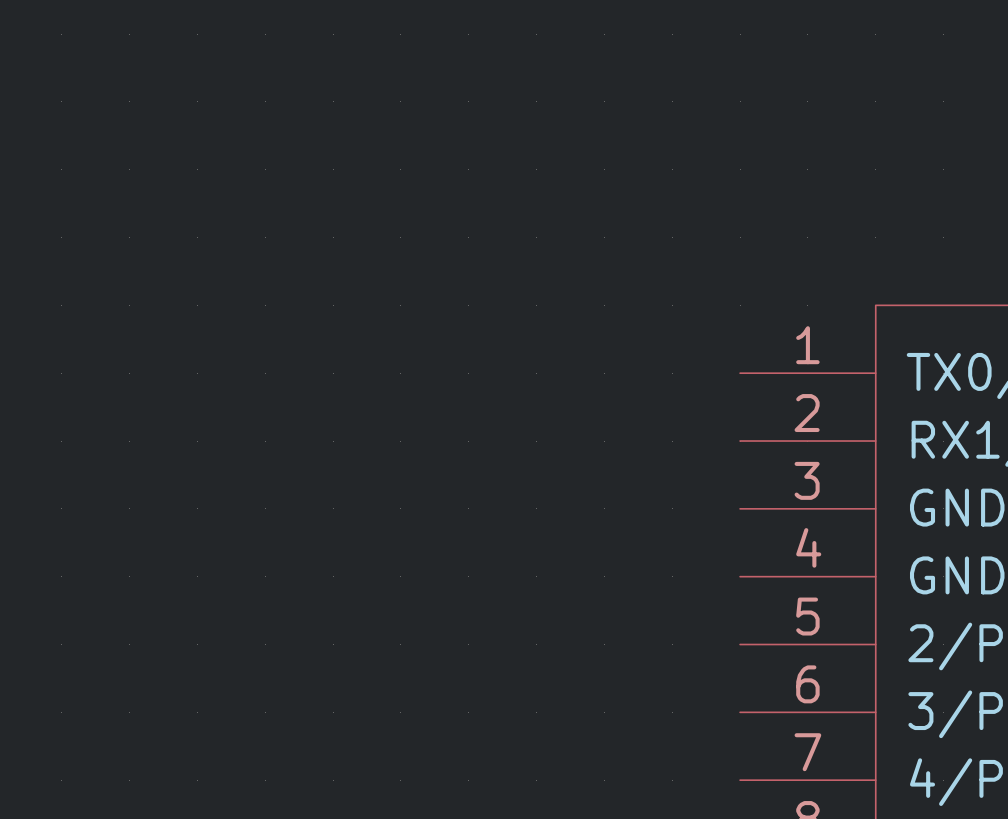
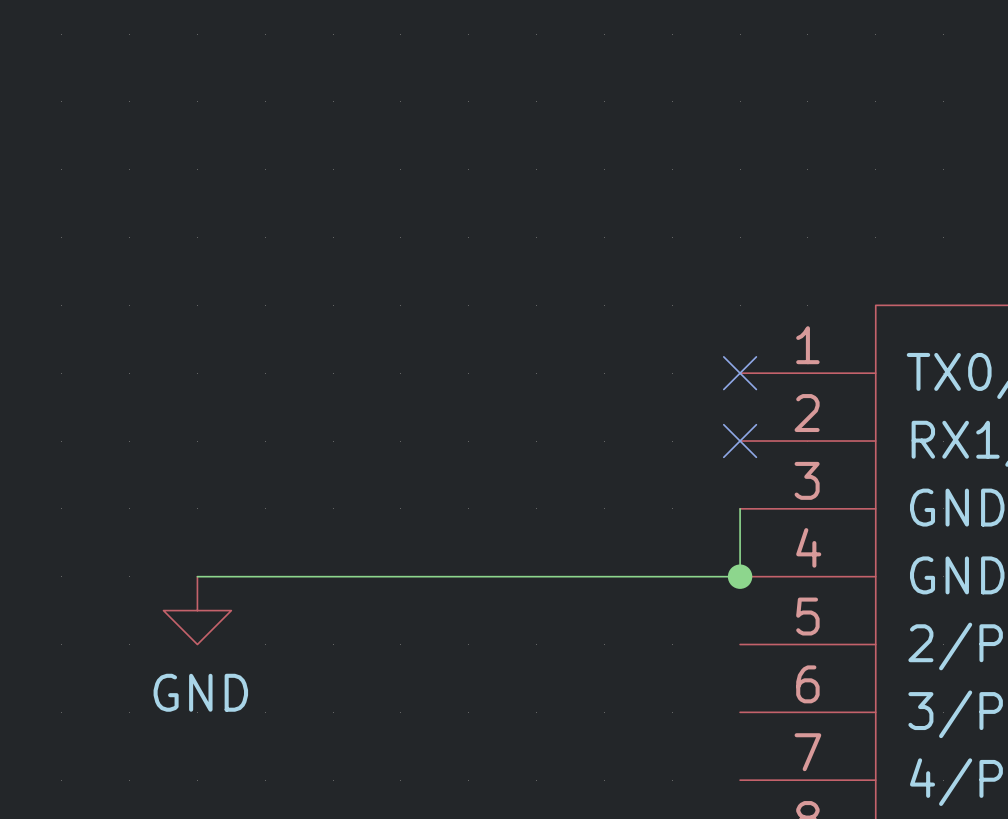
no-connect mark: none -> (740, 373)
no-connect mark: none -> (740, 441)
wire: none -> (740, 508) (740, 576) (197, 576)
junction: none -> (740, 576)
power symbol: none -> GND (197, 610)

